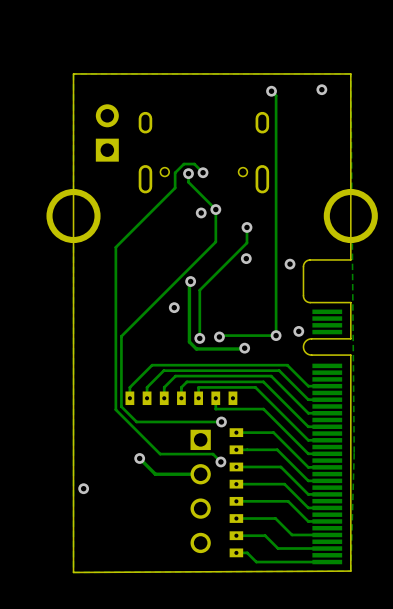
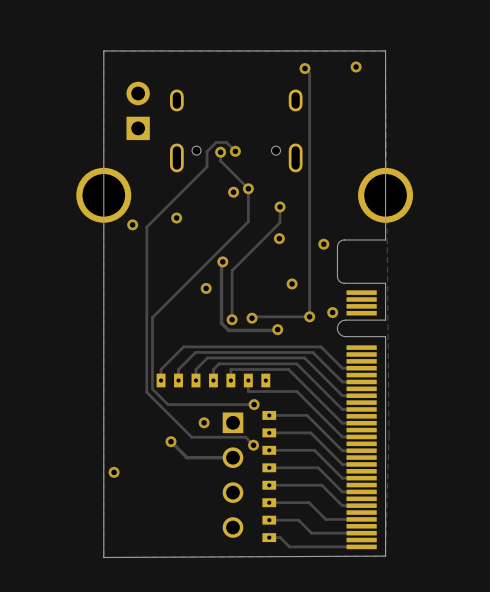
via: none -> (176, 217)
via: none -> (132, 224)
via: none -> (292, 283)
via: none -> (204, 422)

